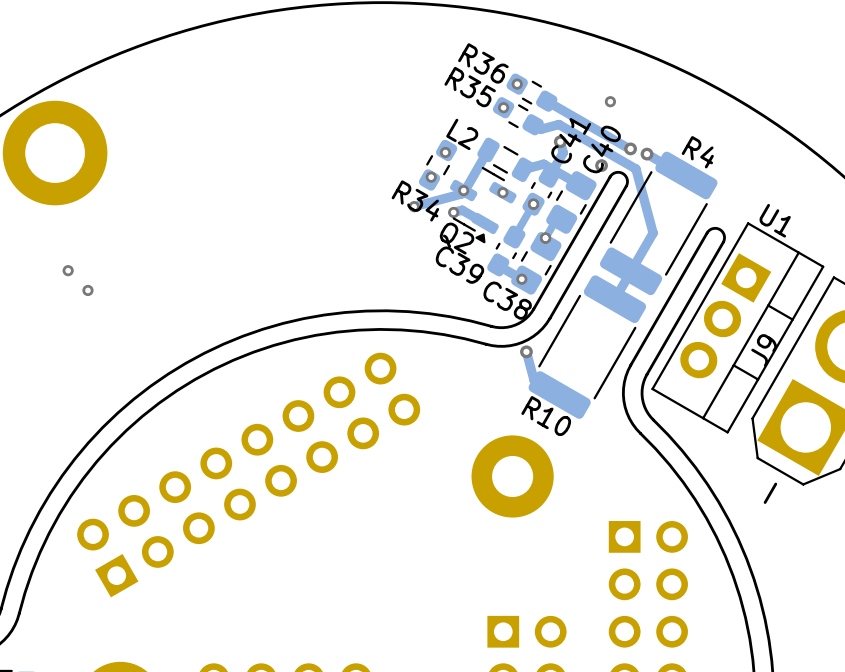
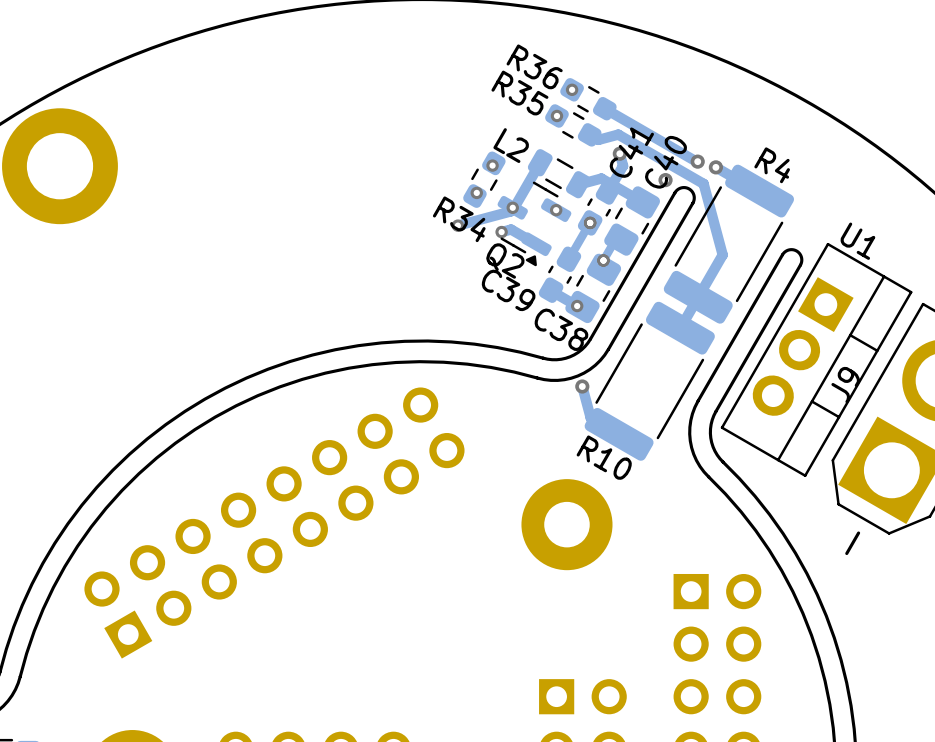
via: (610, 101) -> none
via: (68, 270) -> none
via: (87, 290) -> none

